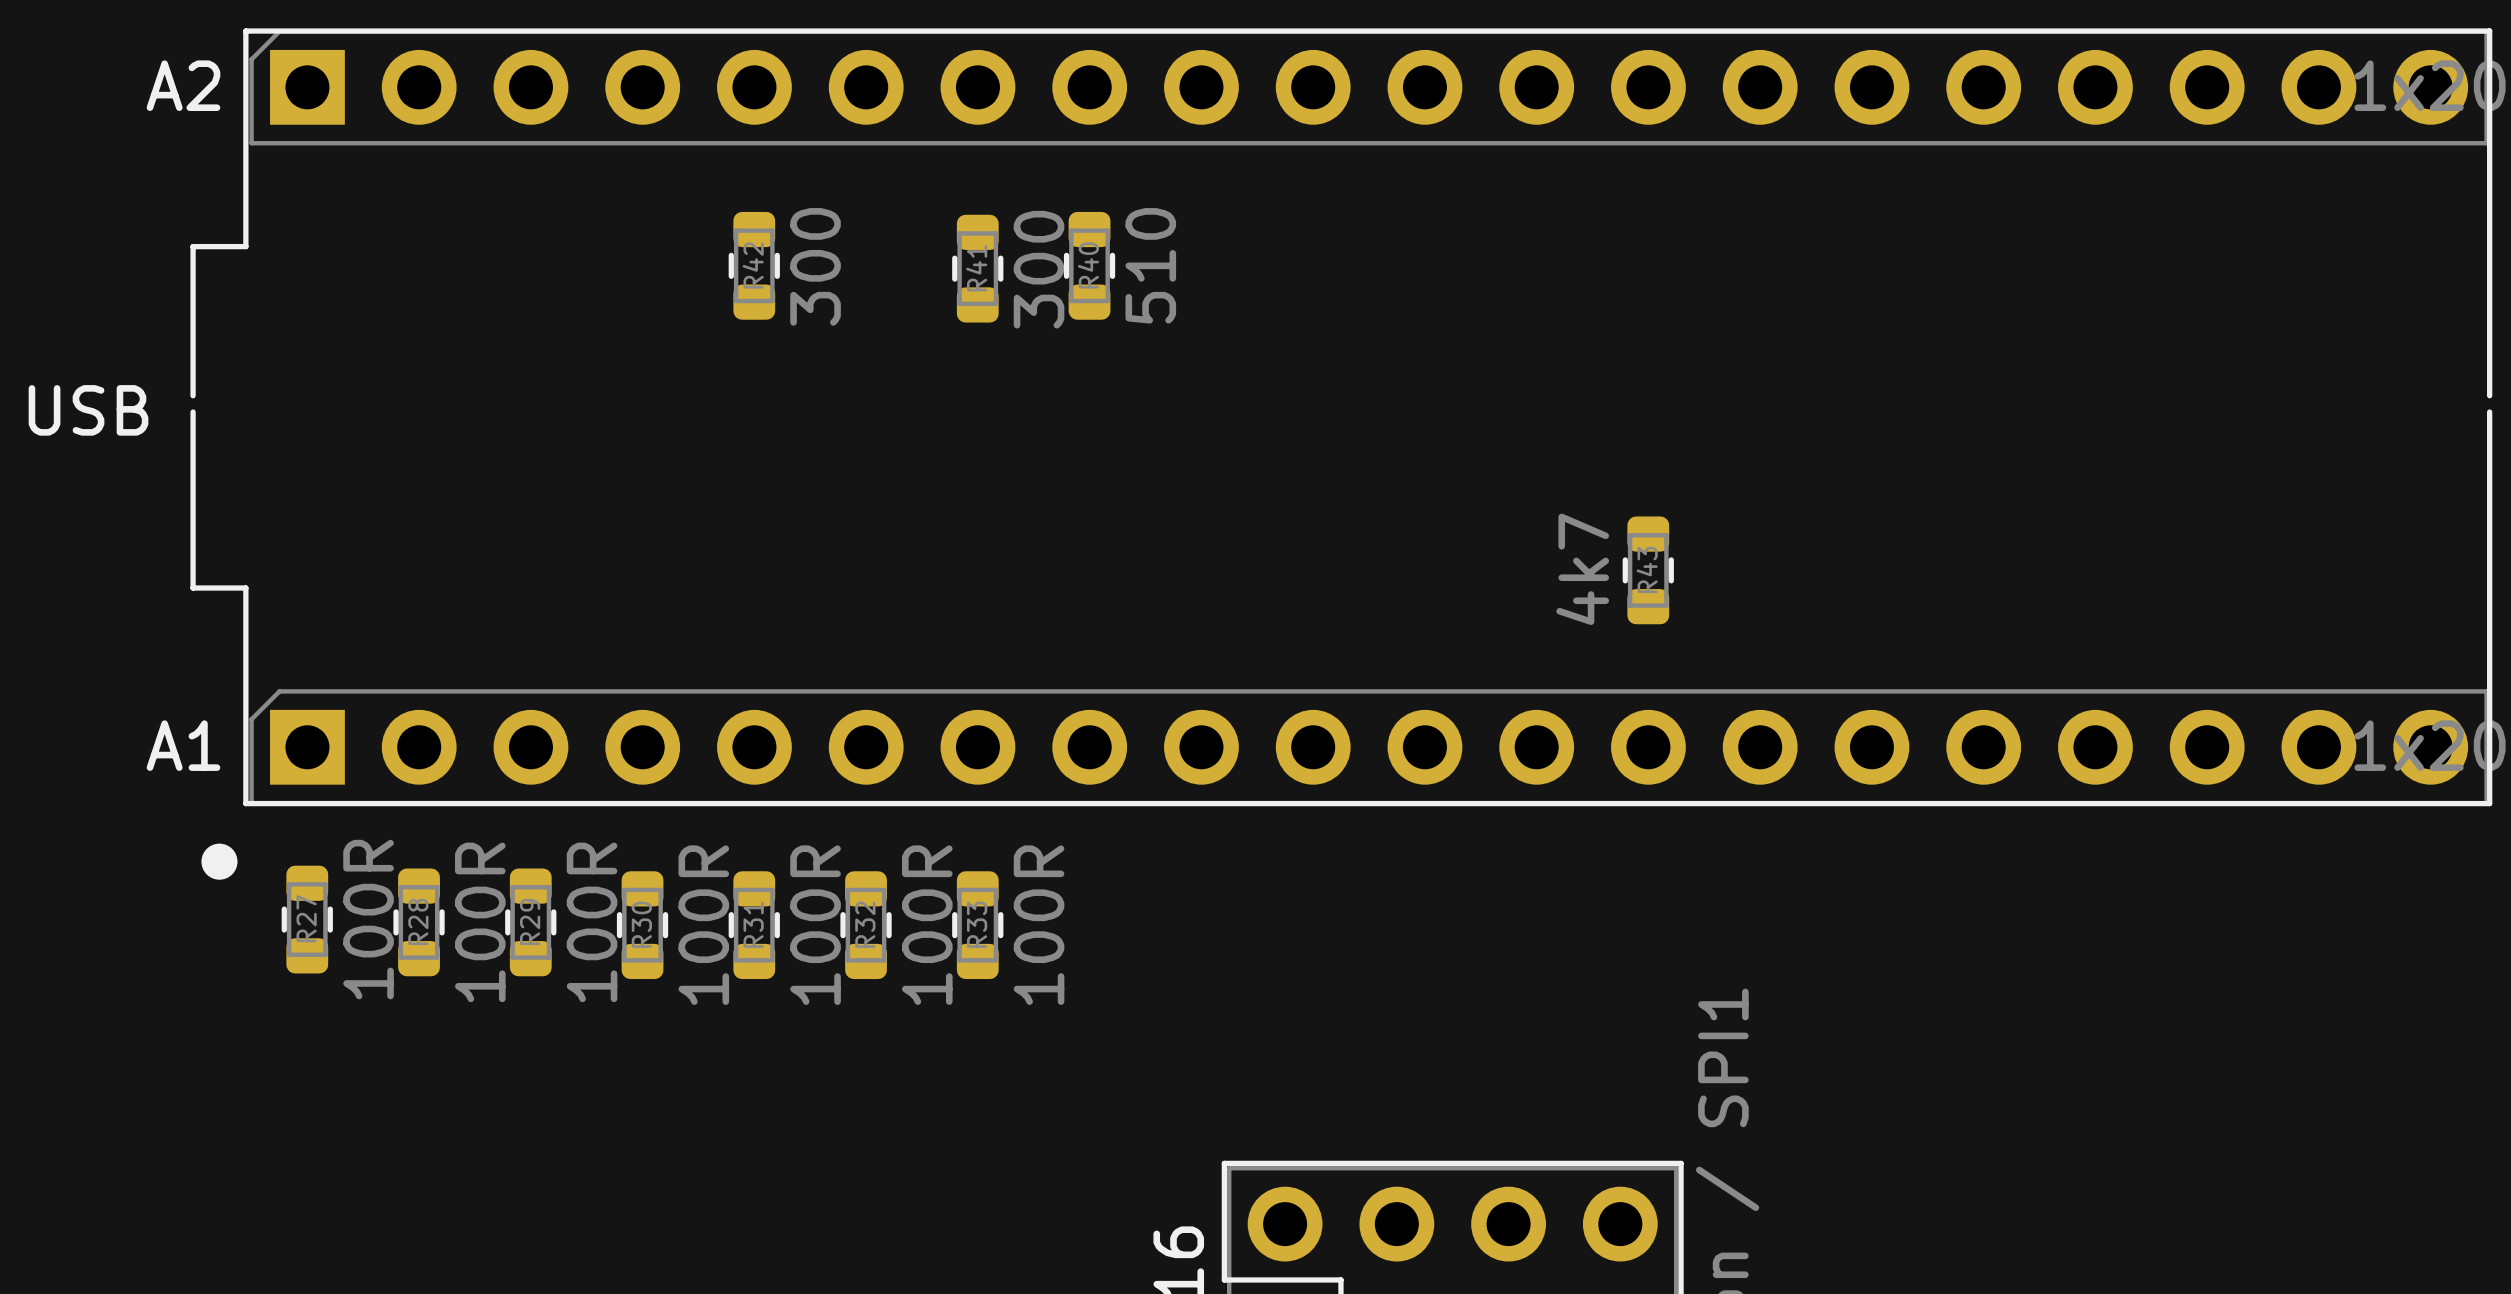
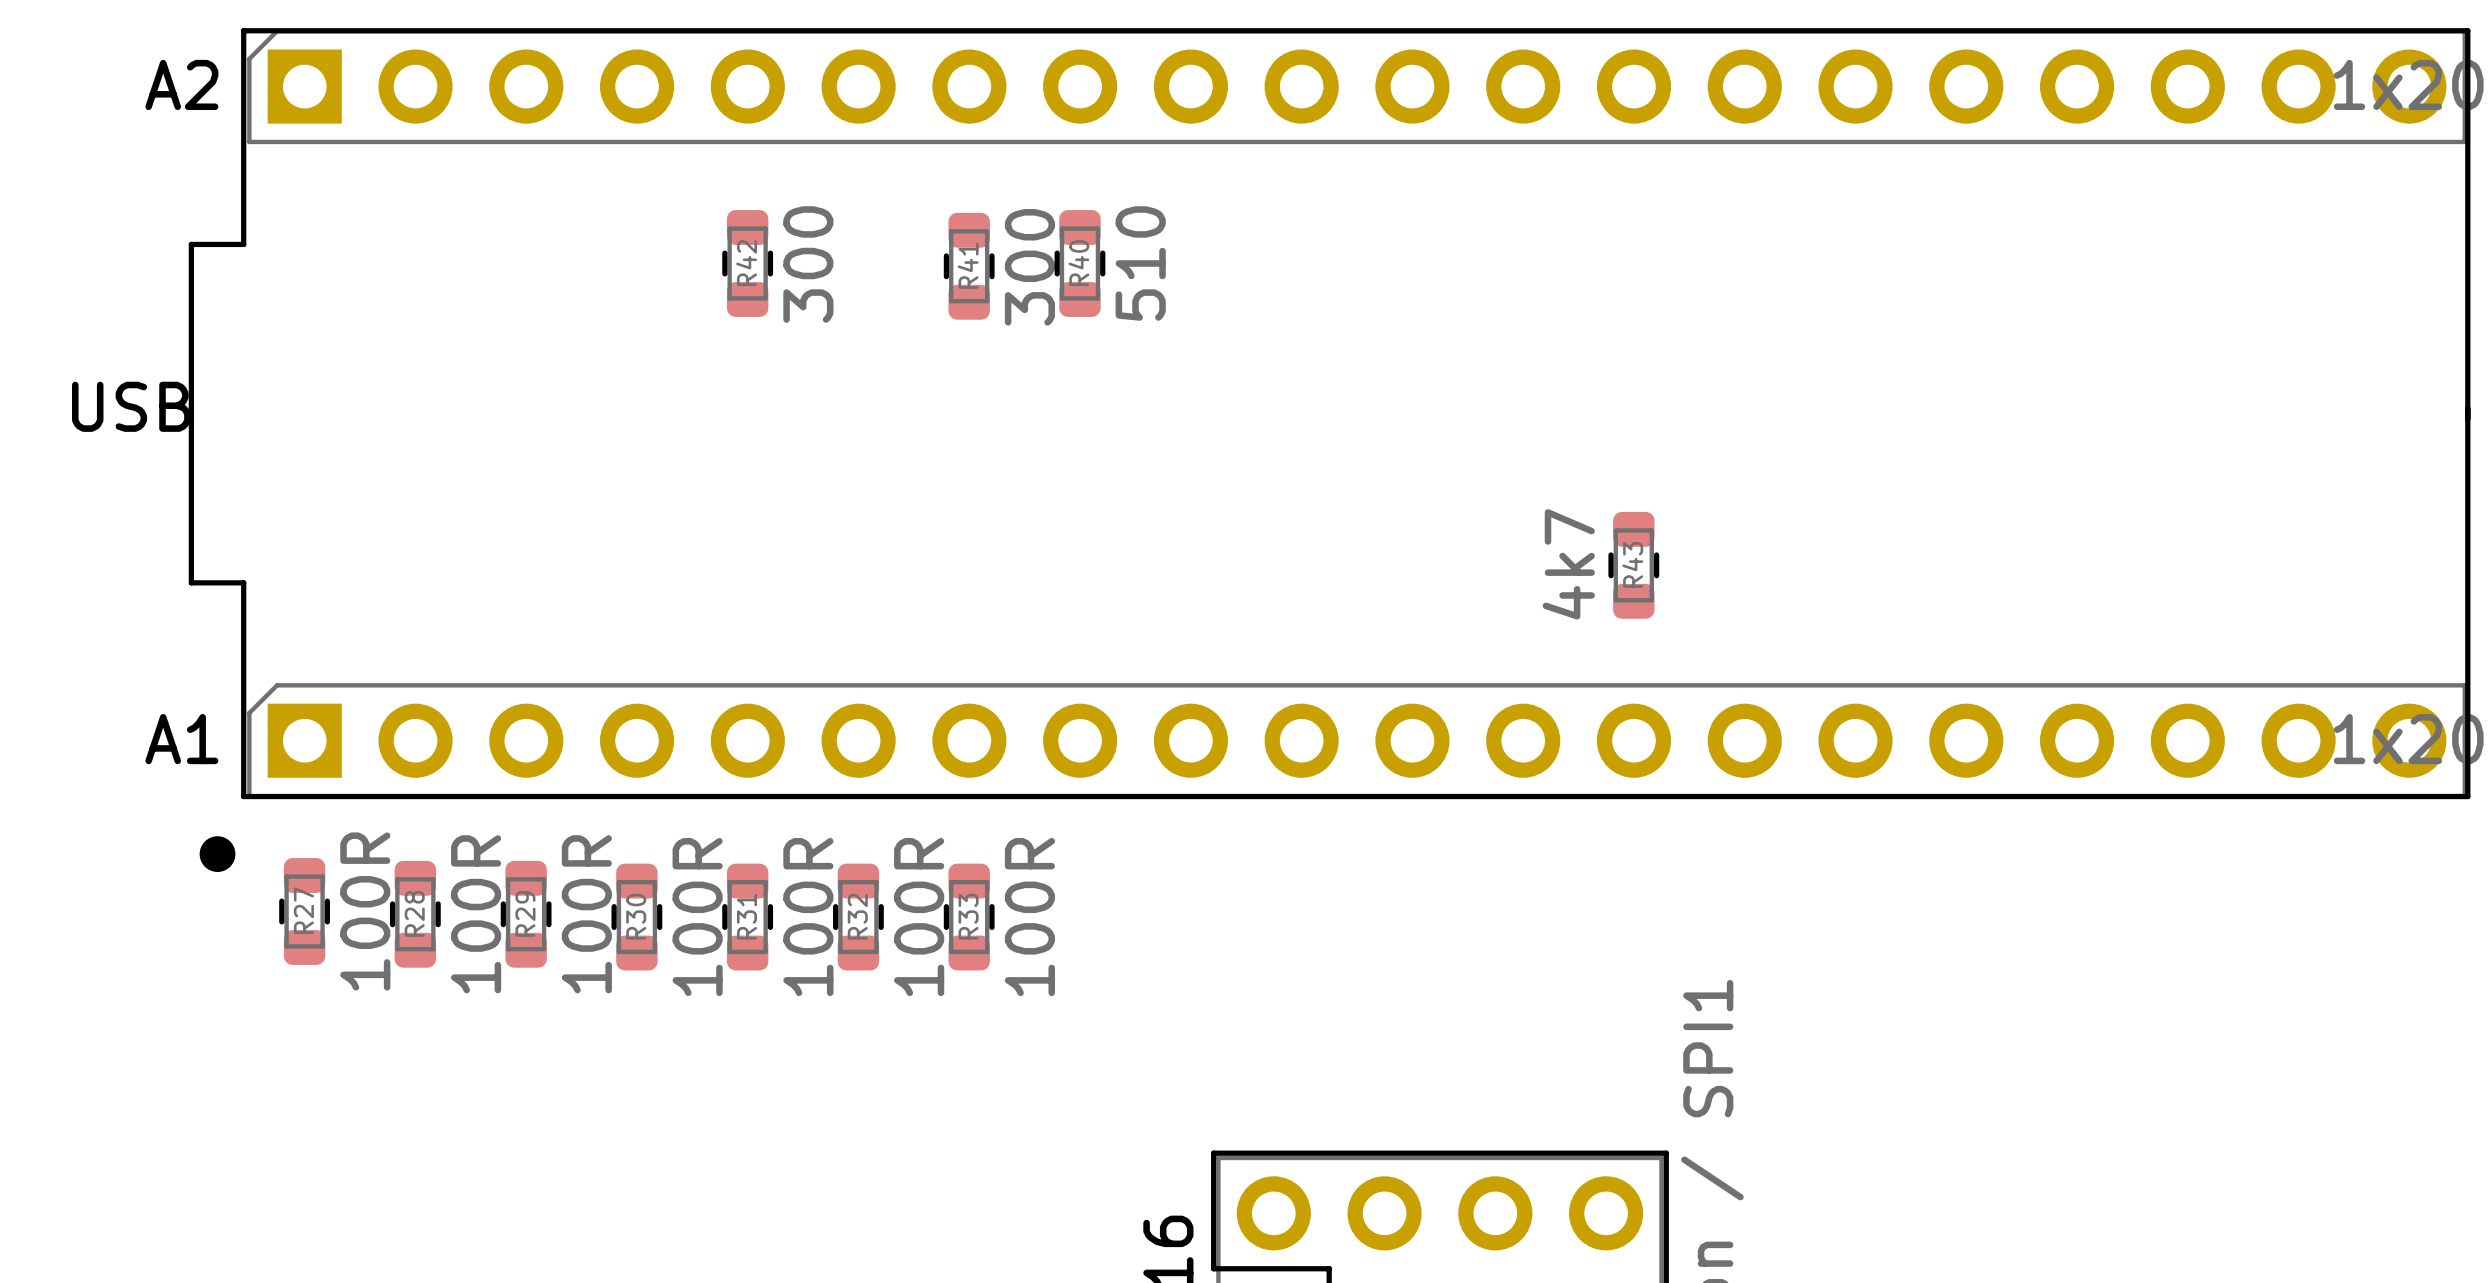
A2 footprint: [190, 28, 2493, 399] -> [188, 28, 2471, 422]
A1 text position: USB (88, 410) -> USB (131, 406)

